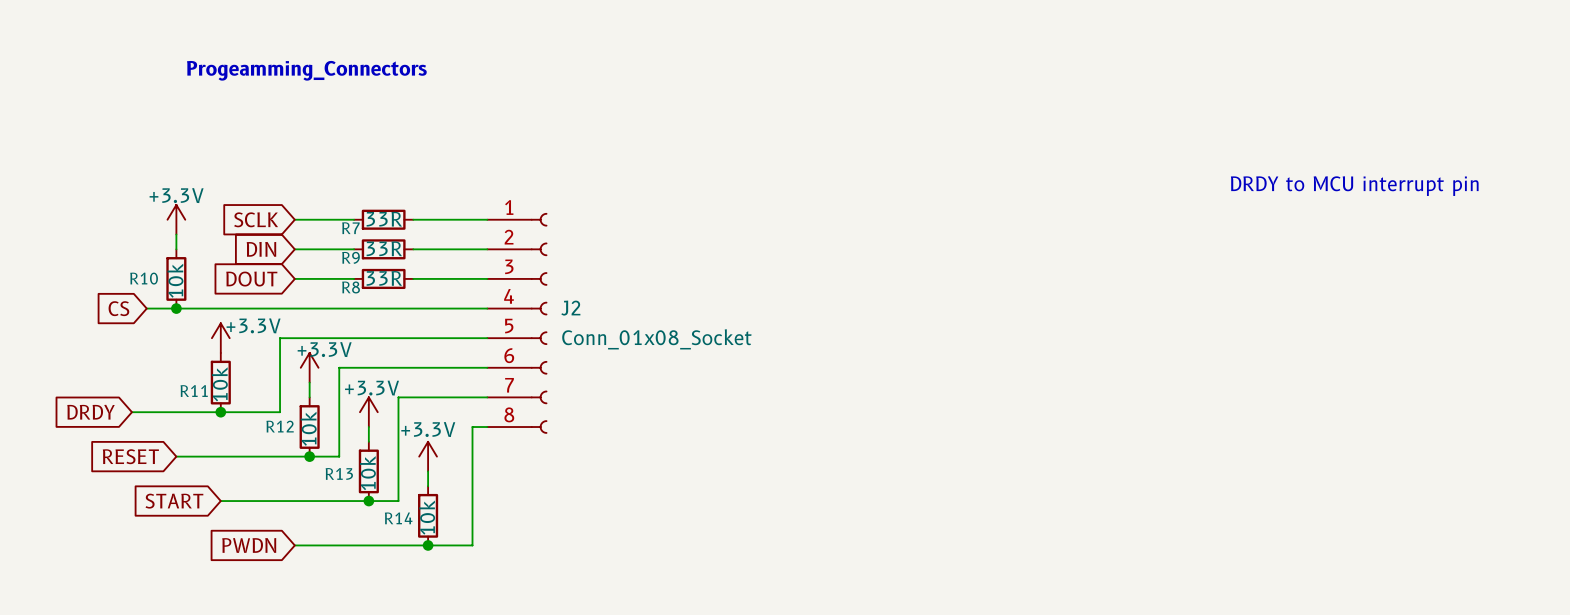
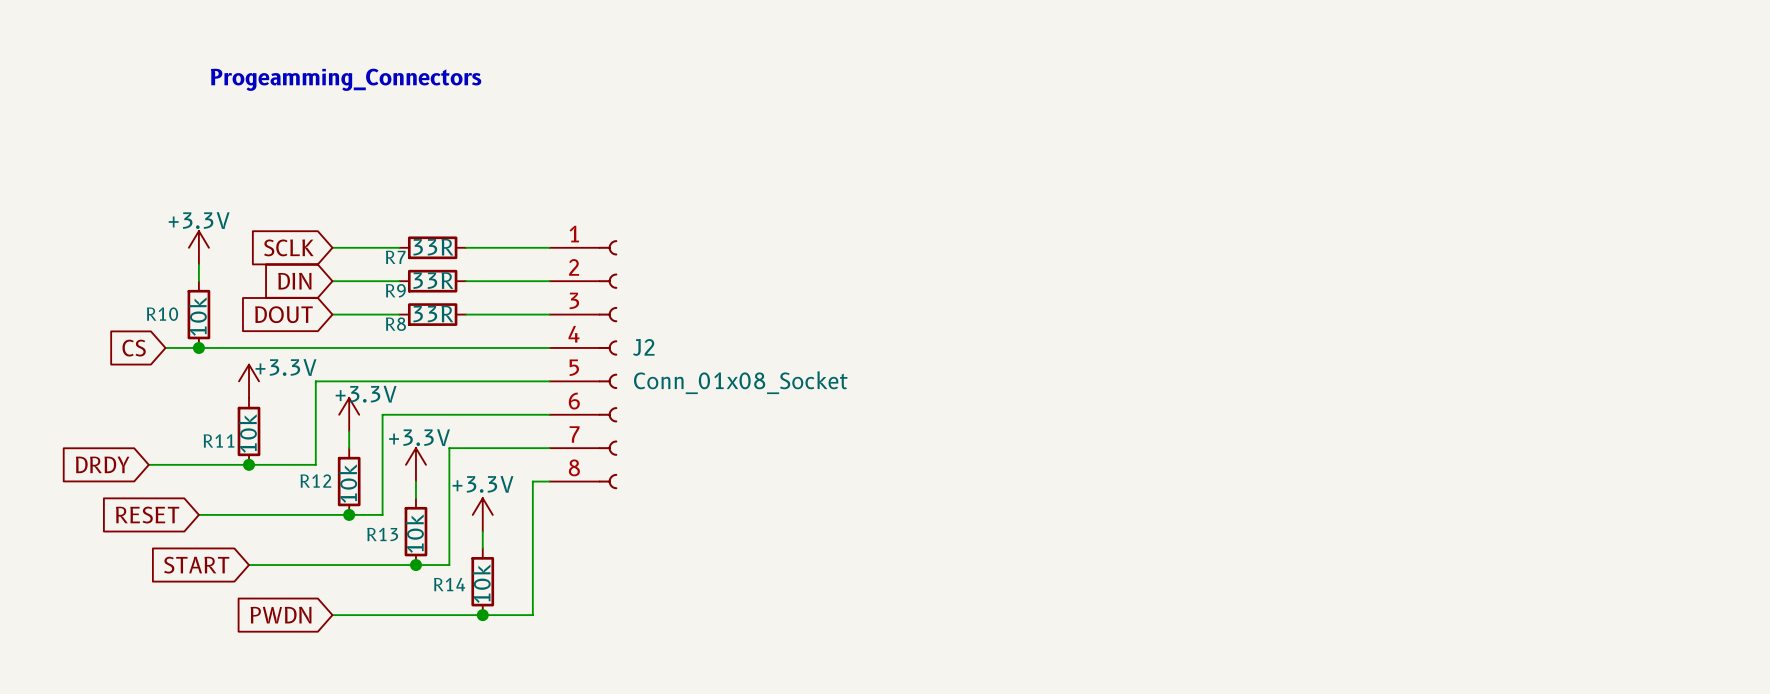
text: DRDY to MCU interrupt pin (1354, 186) -> none

